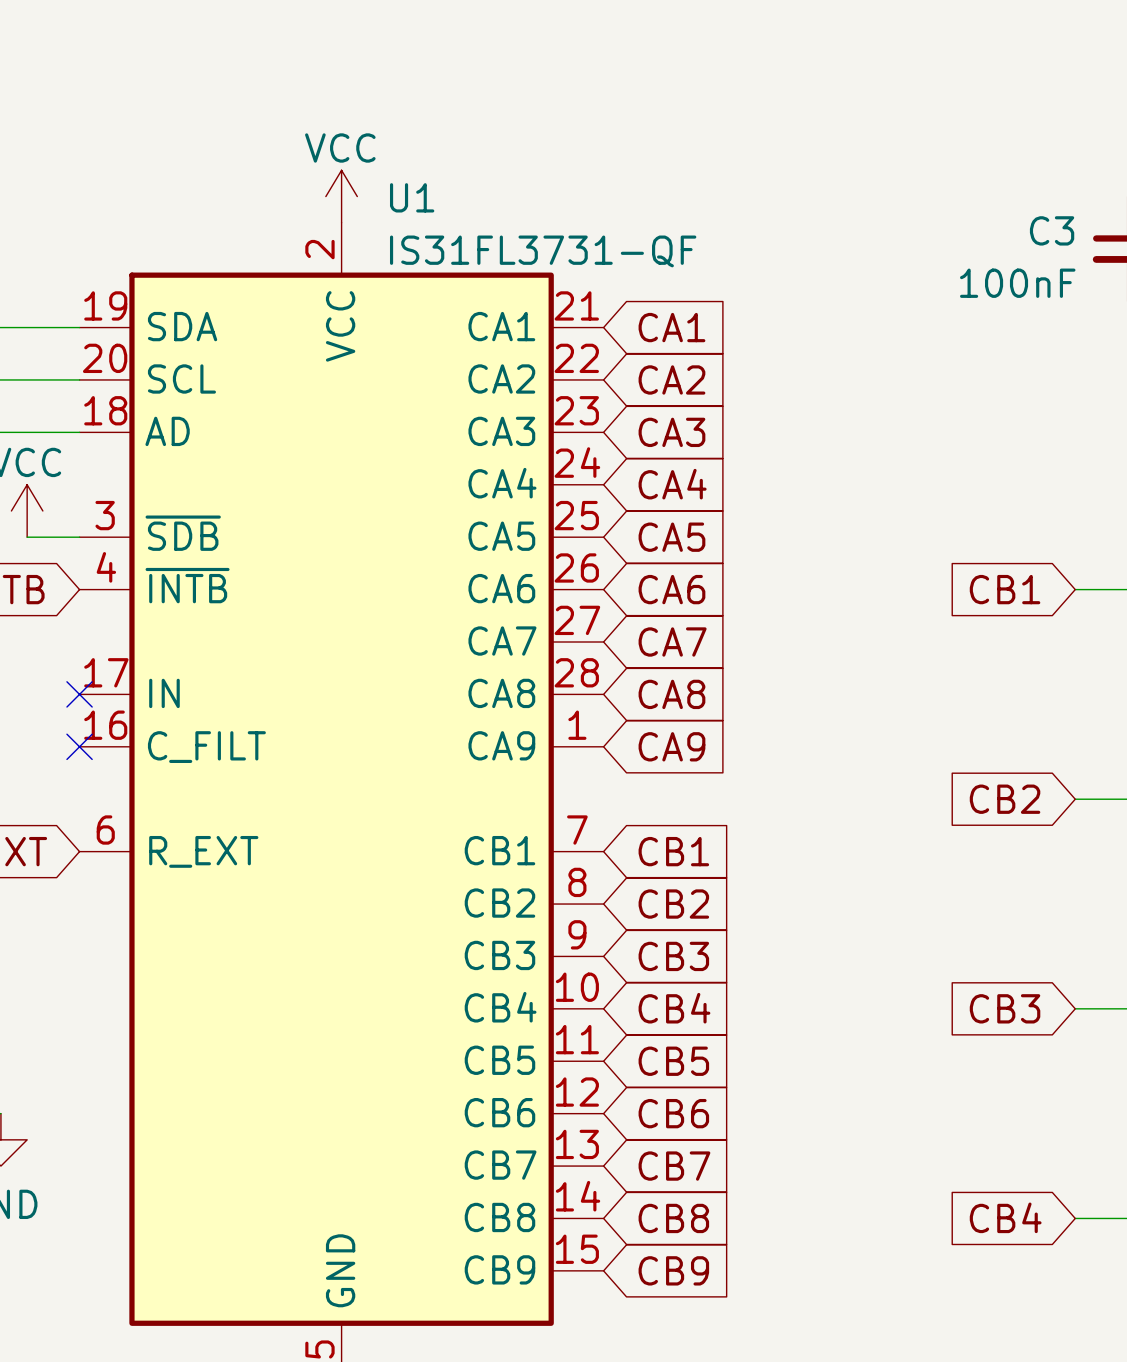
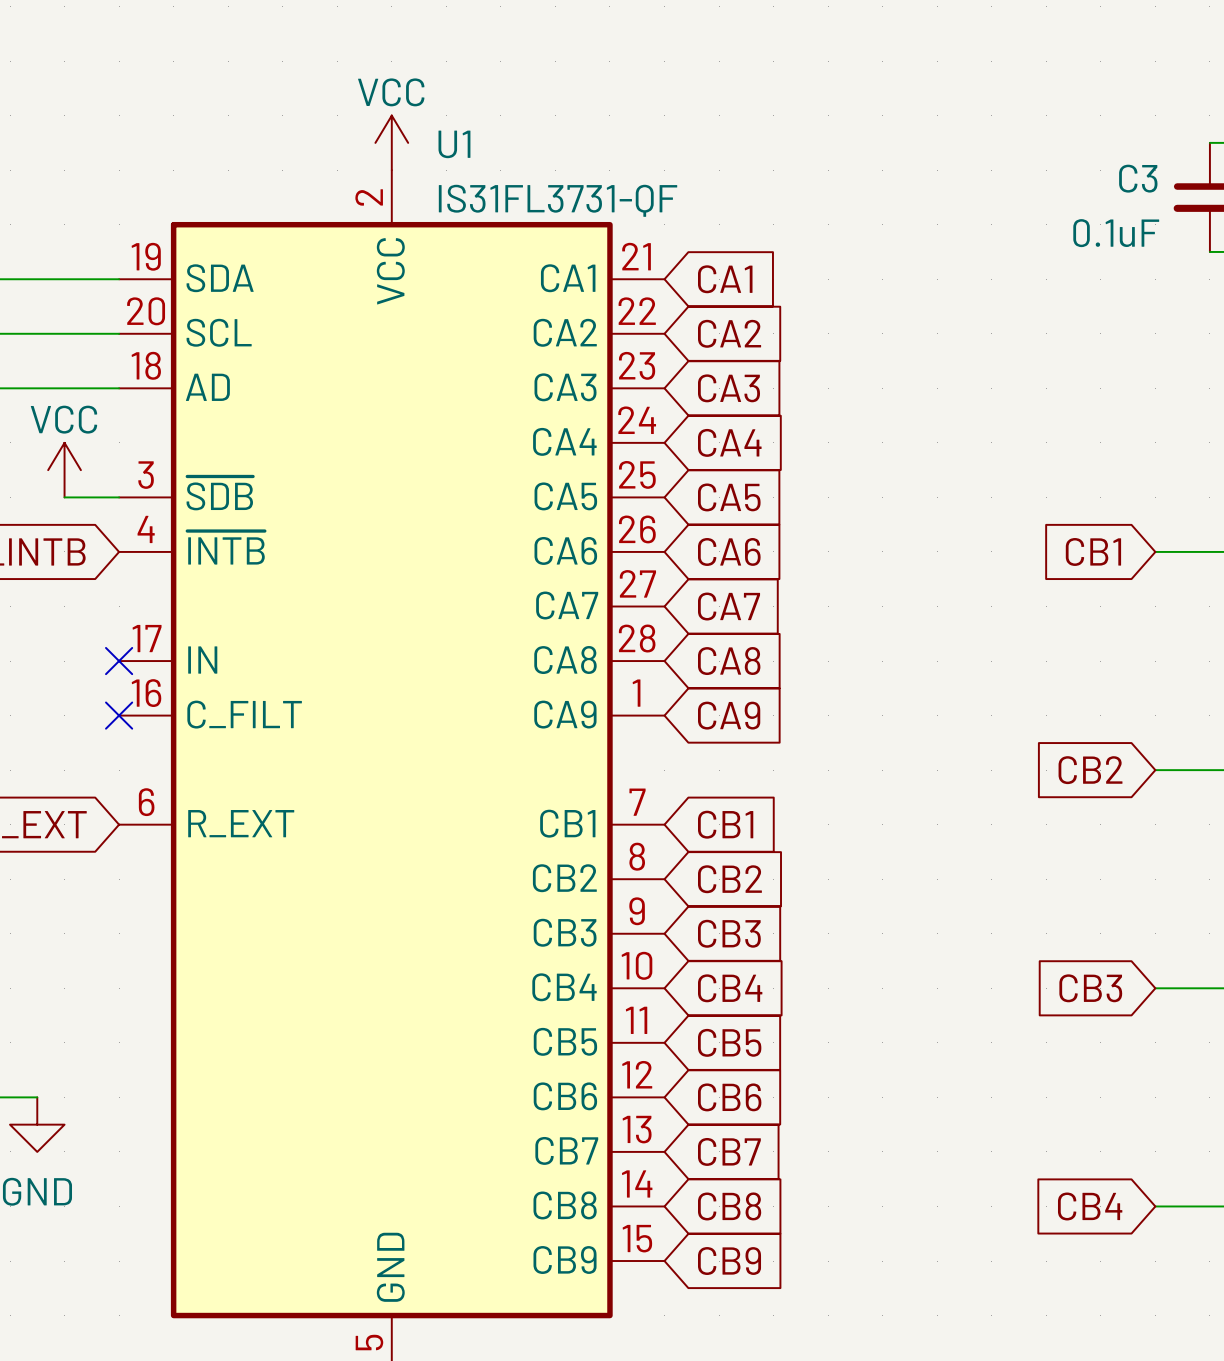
C3 value: 100nF (1017, 283) -> 0.1uF (1116, 233)

